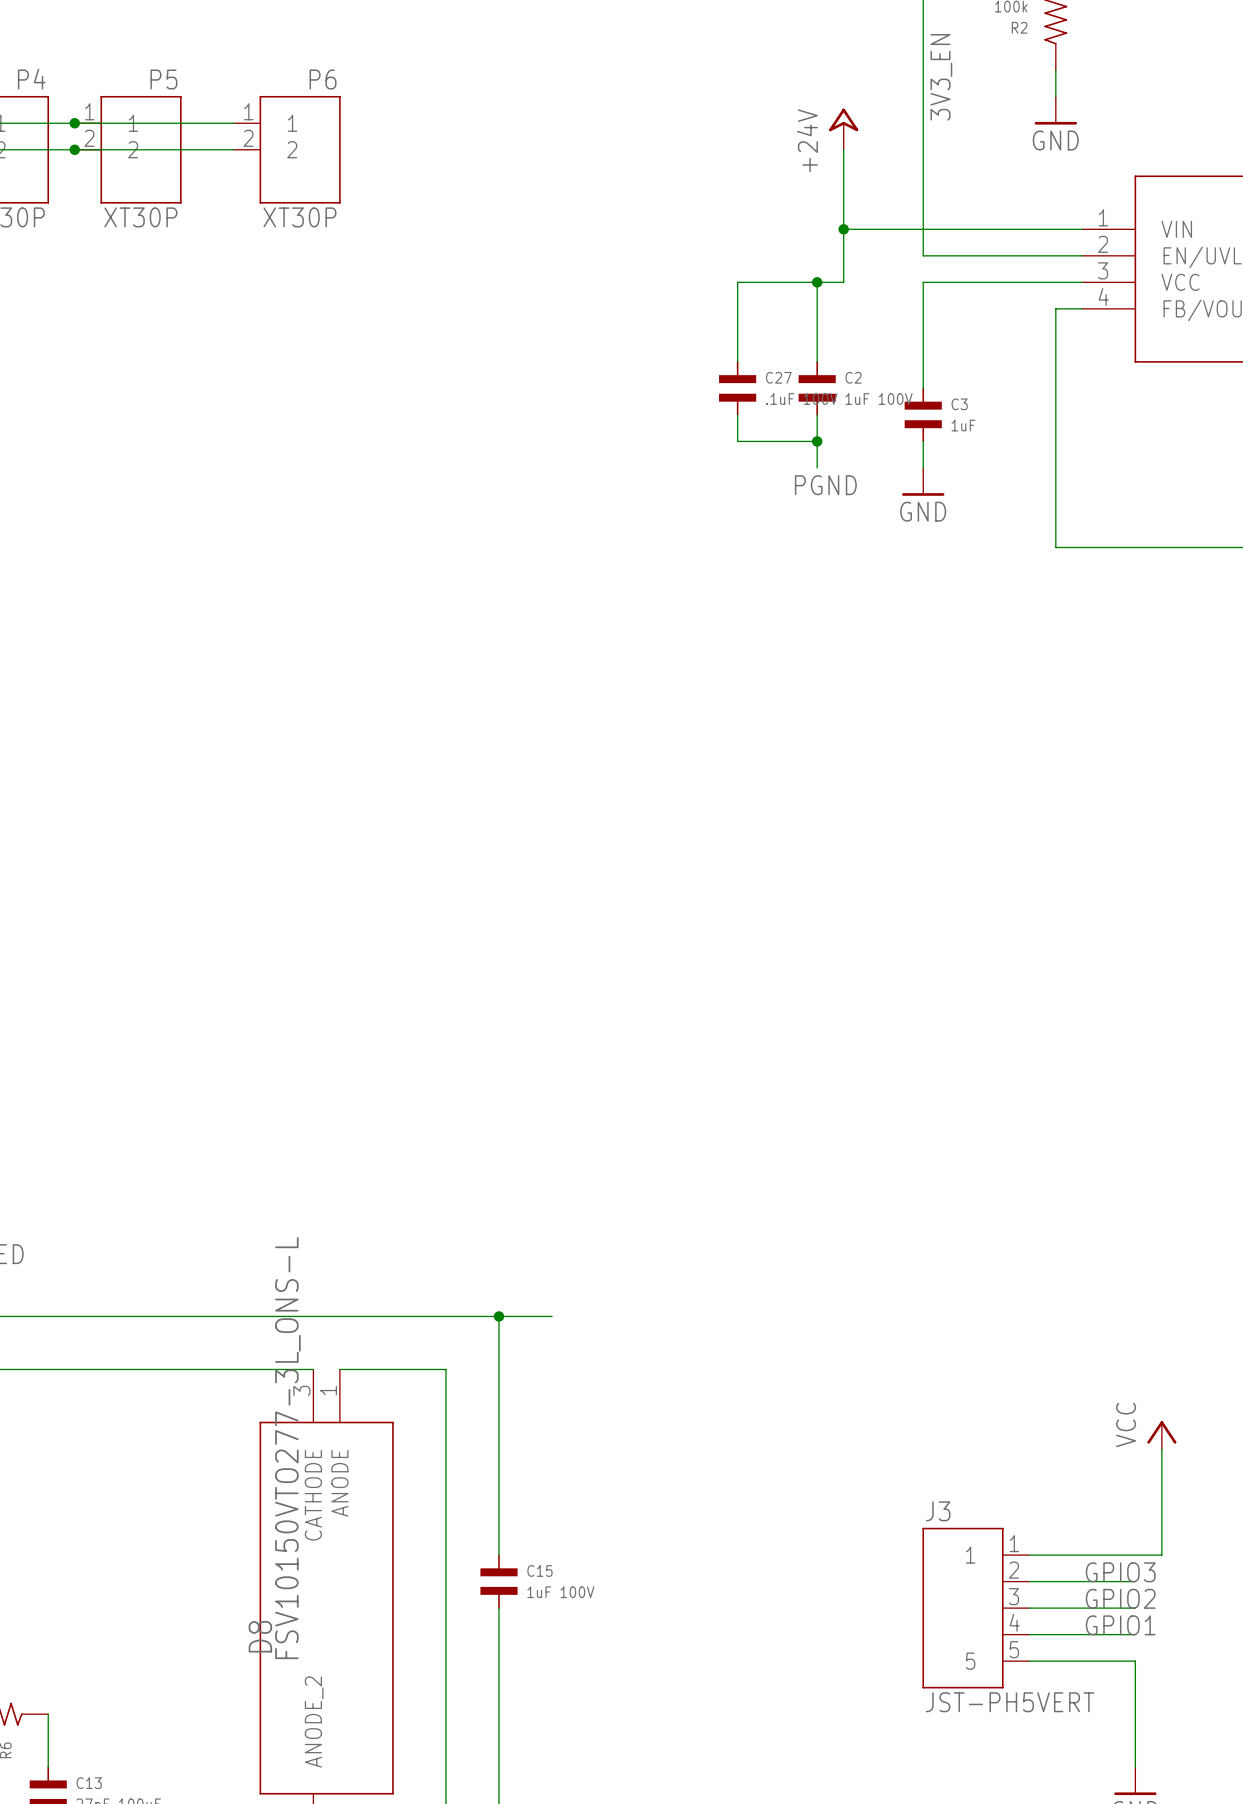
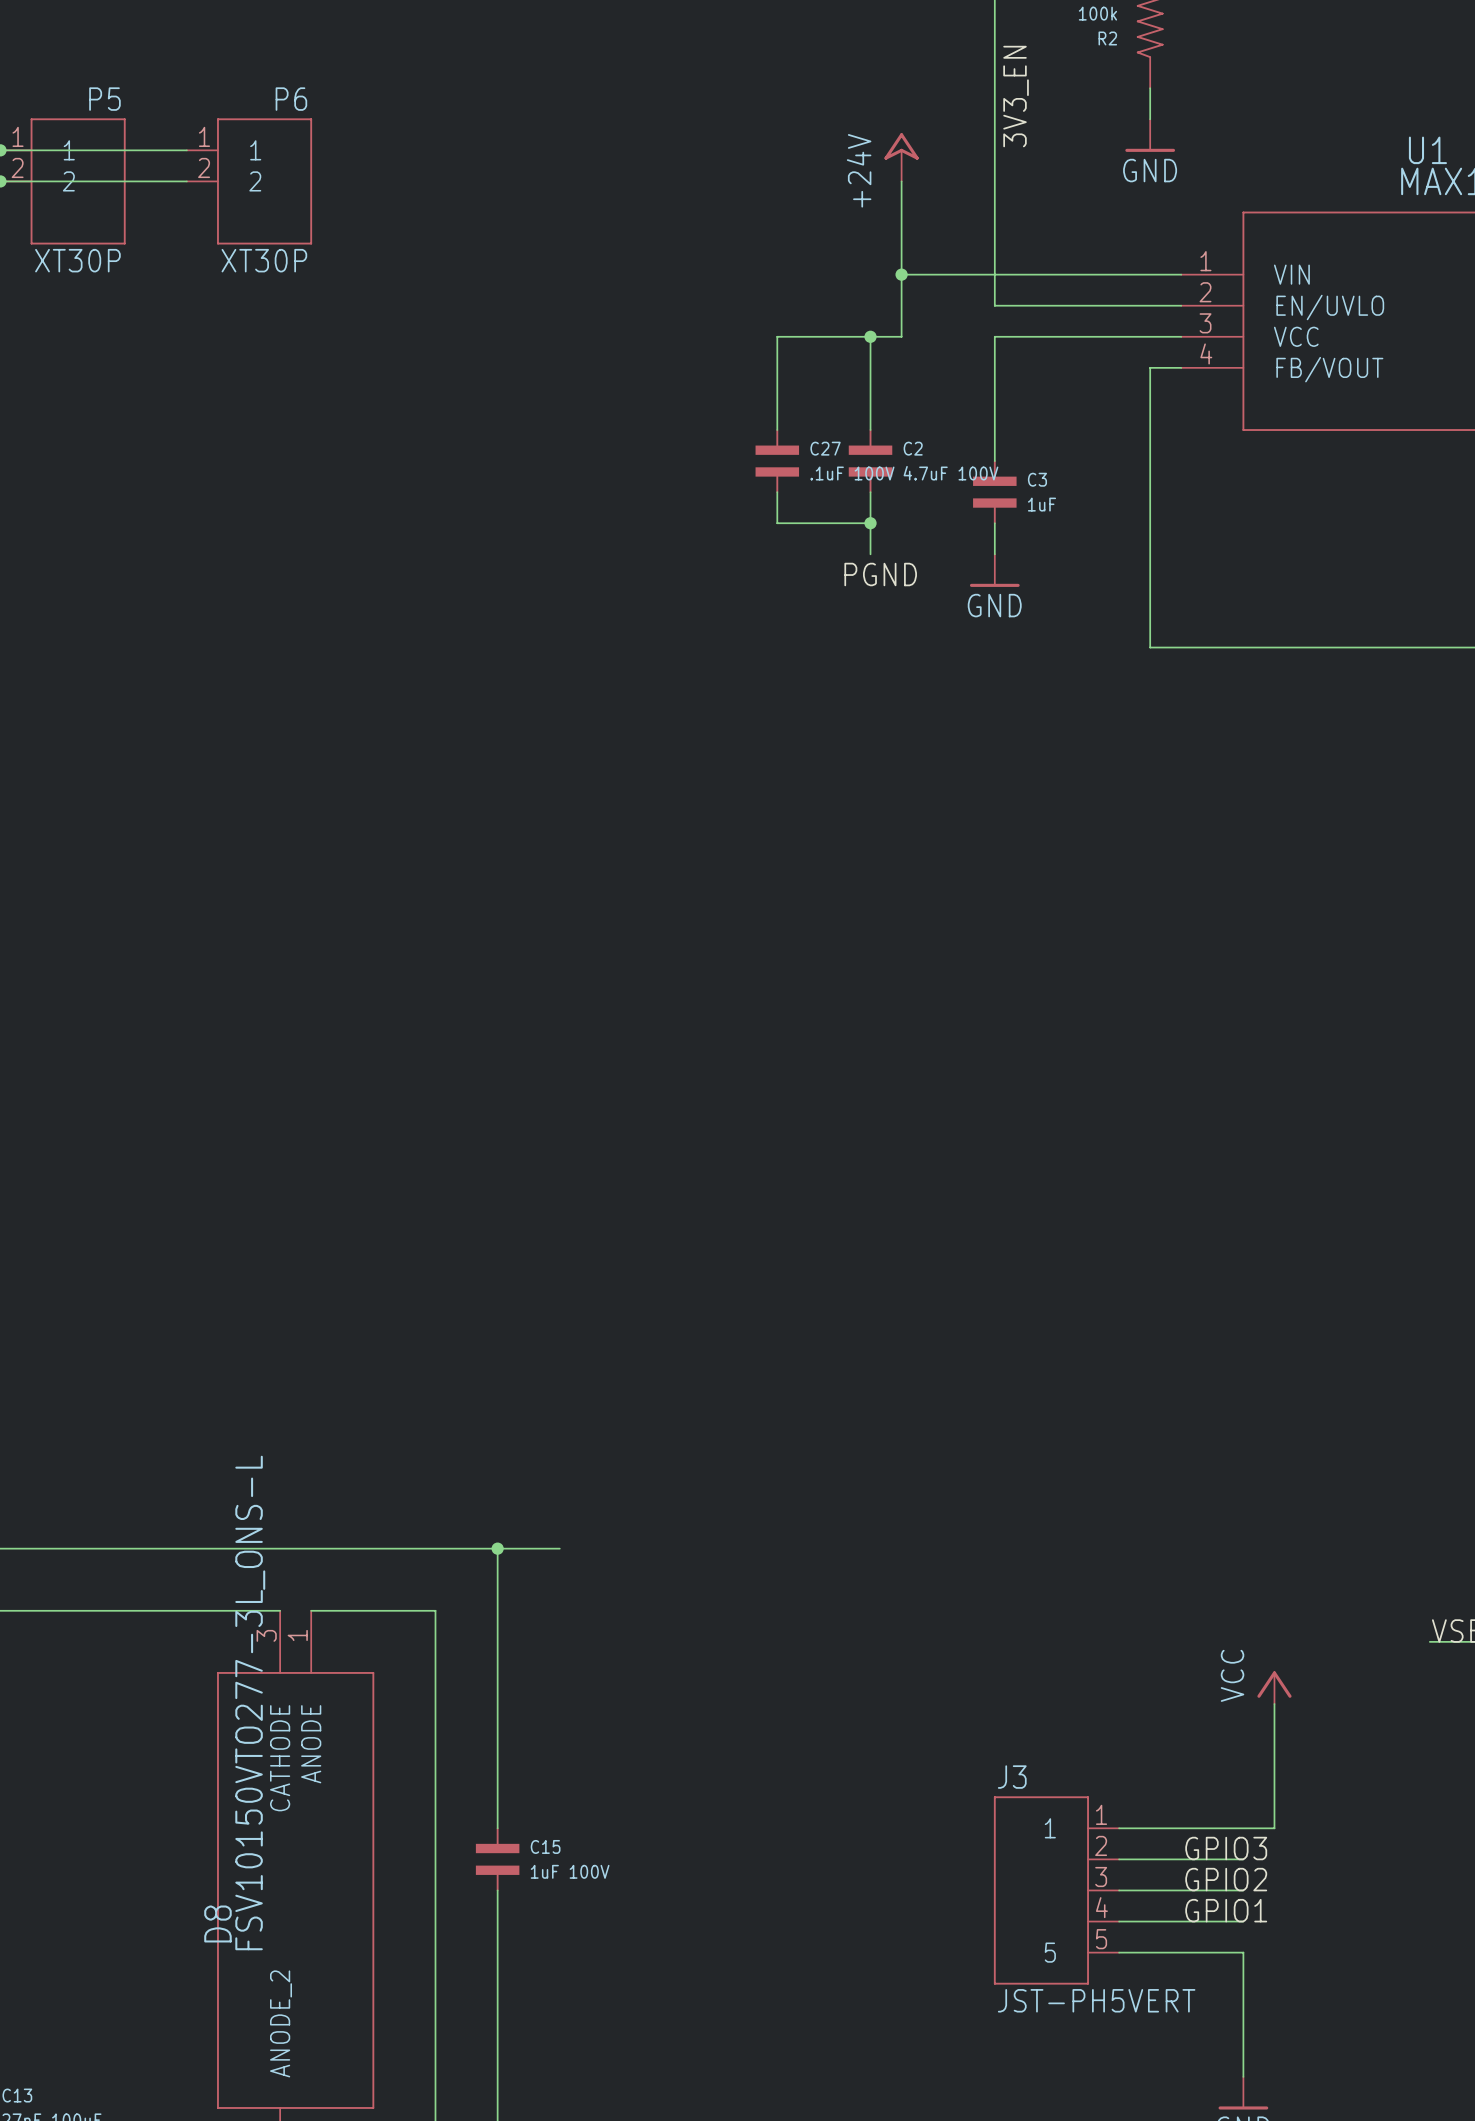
C2 value: 1uF 100V (879, 399) -> 4.7uF 100V (950, 473)

